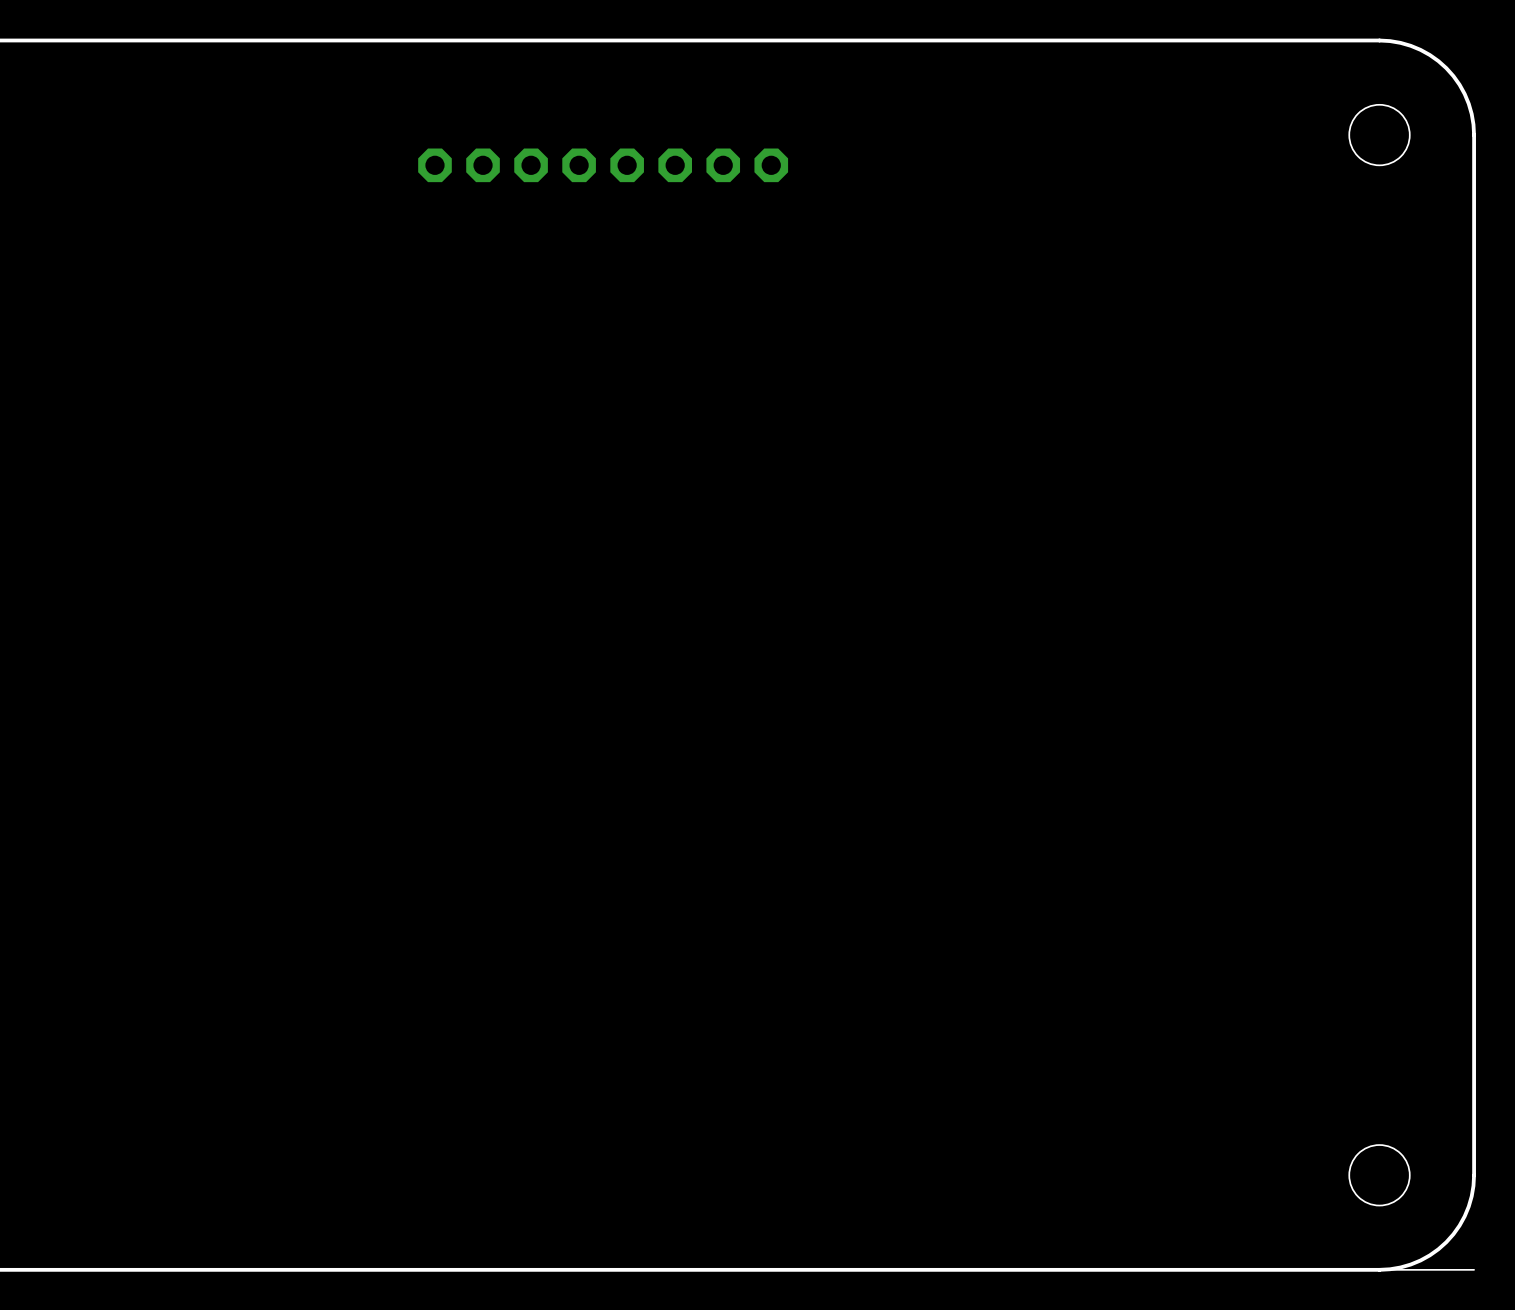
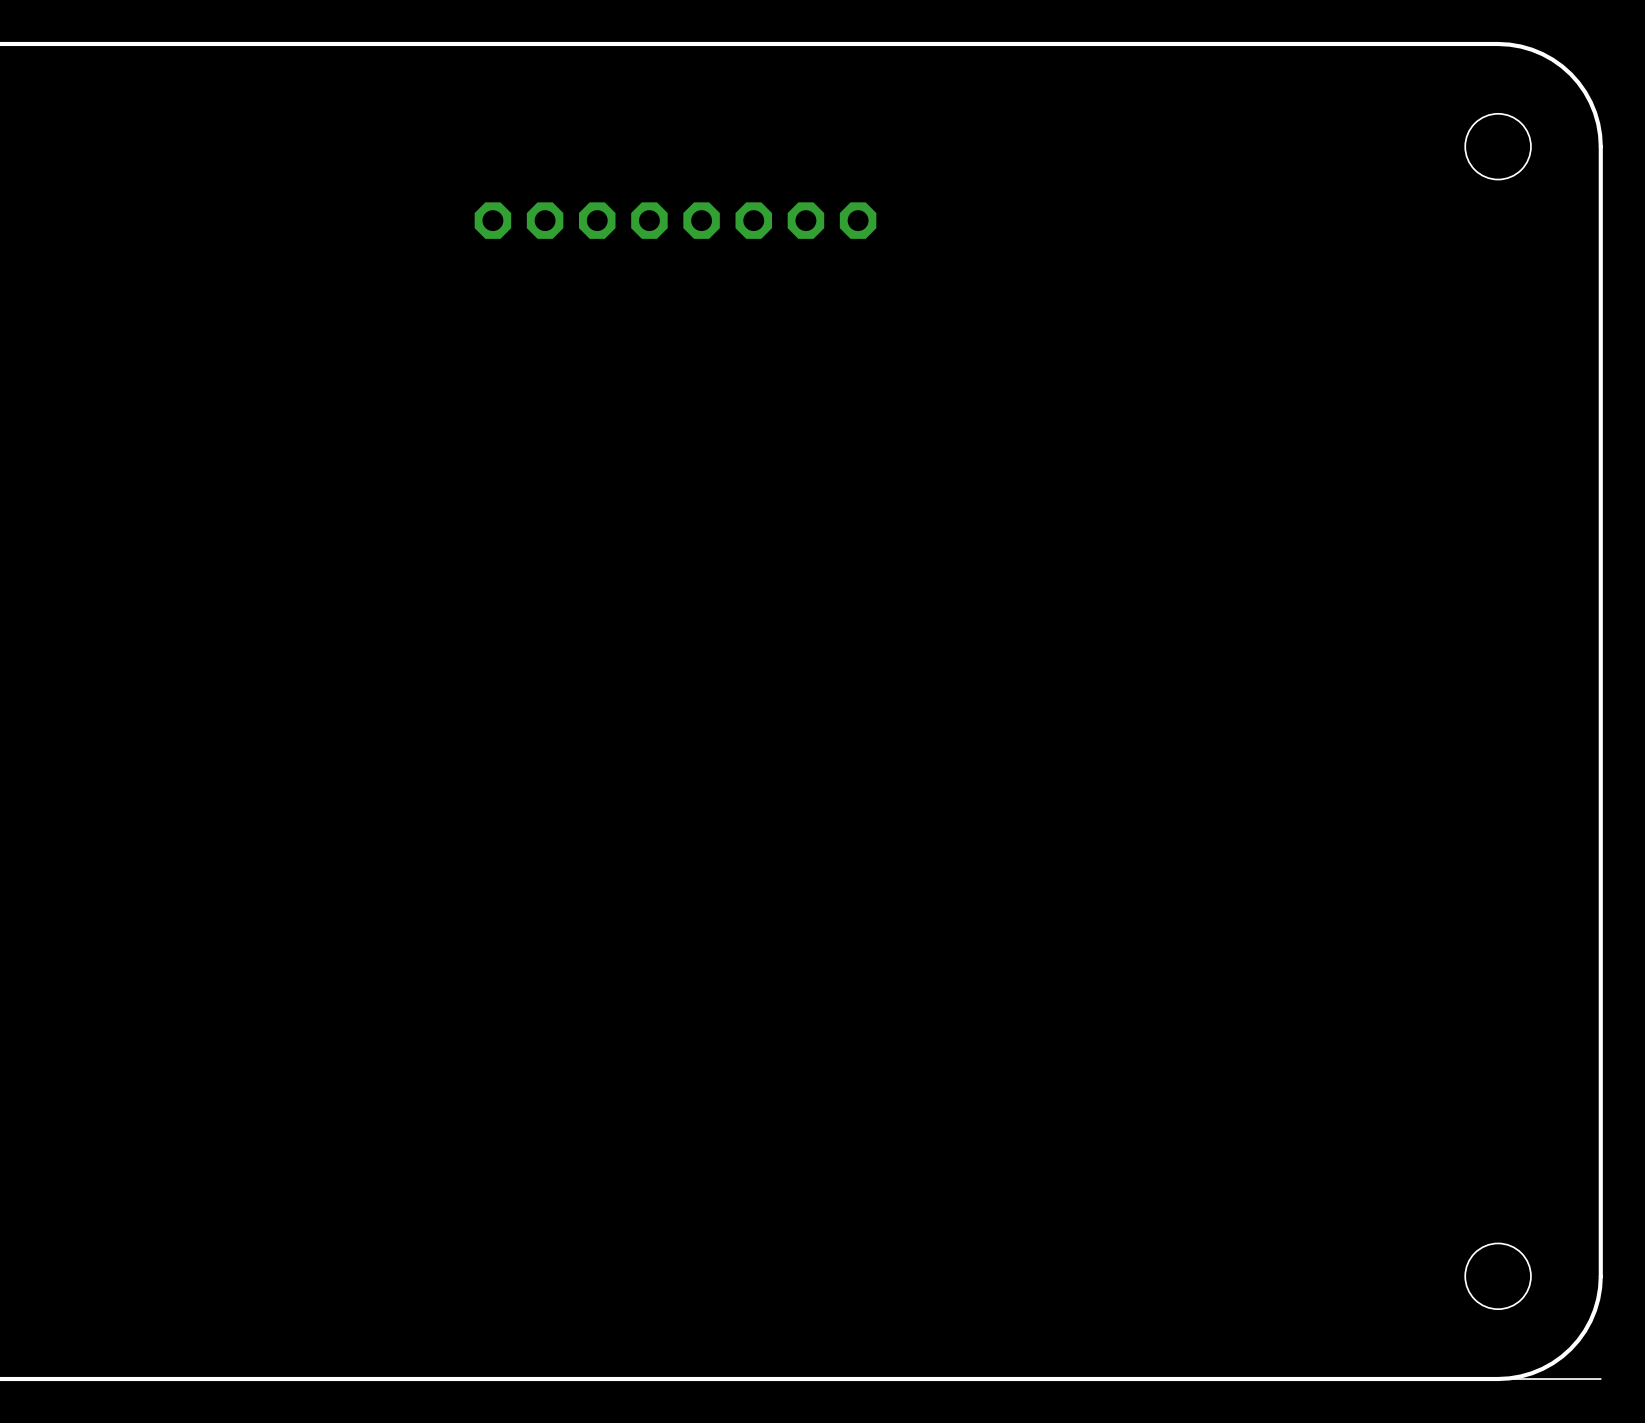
part position: (603, 165) -> (675, 220)

